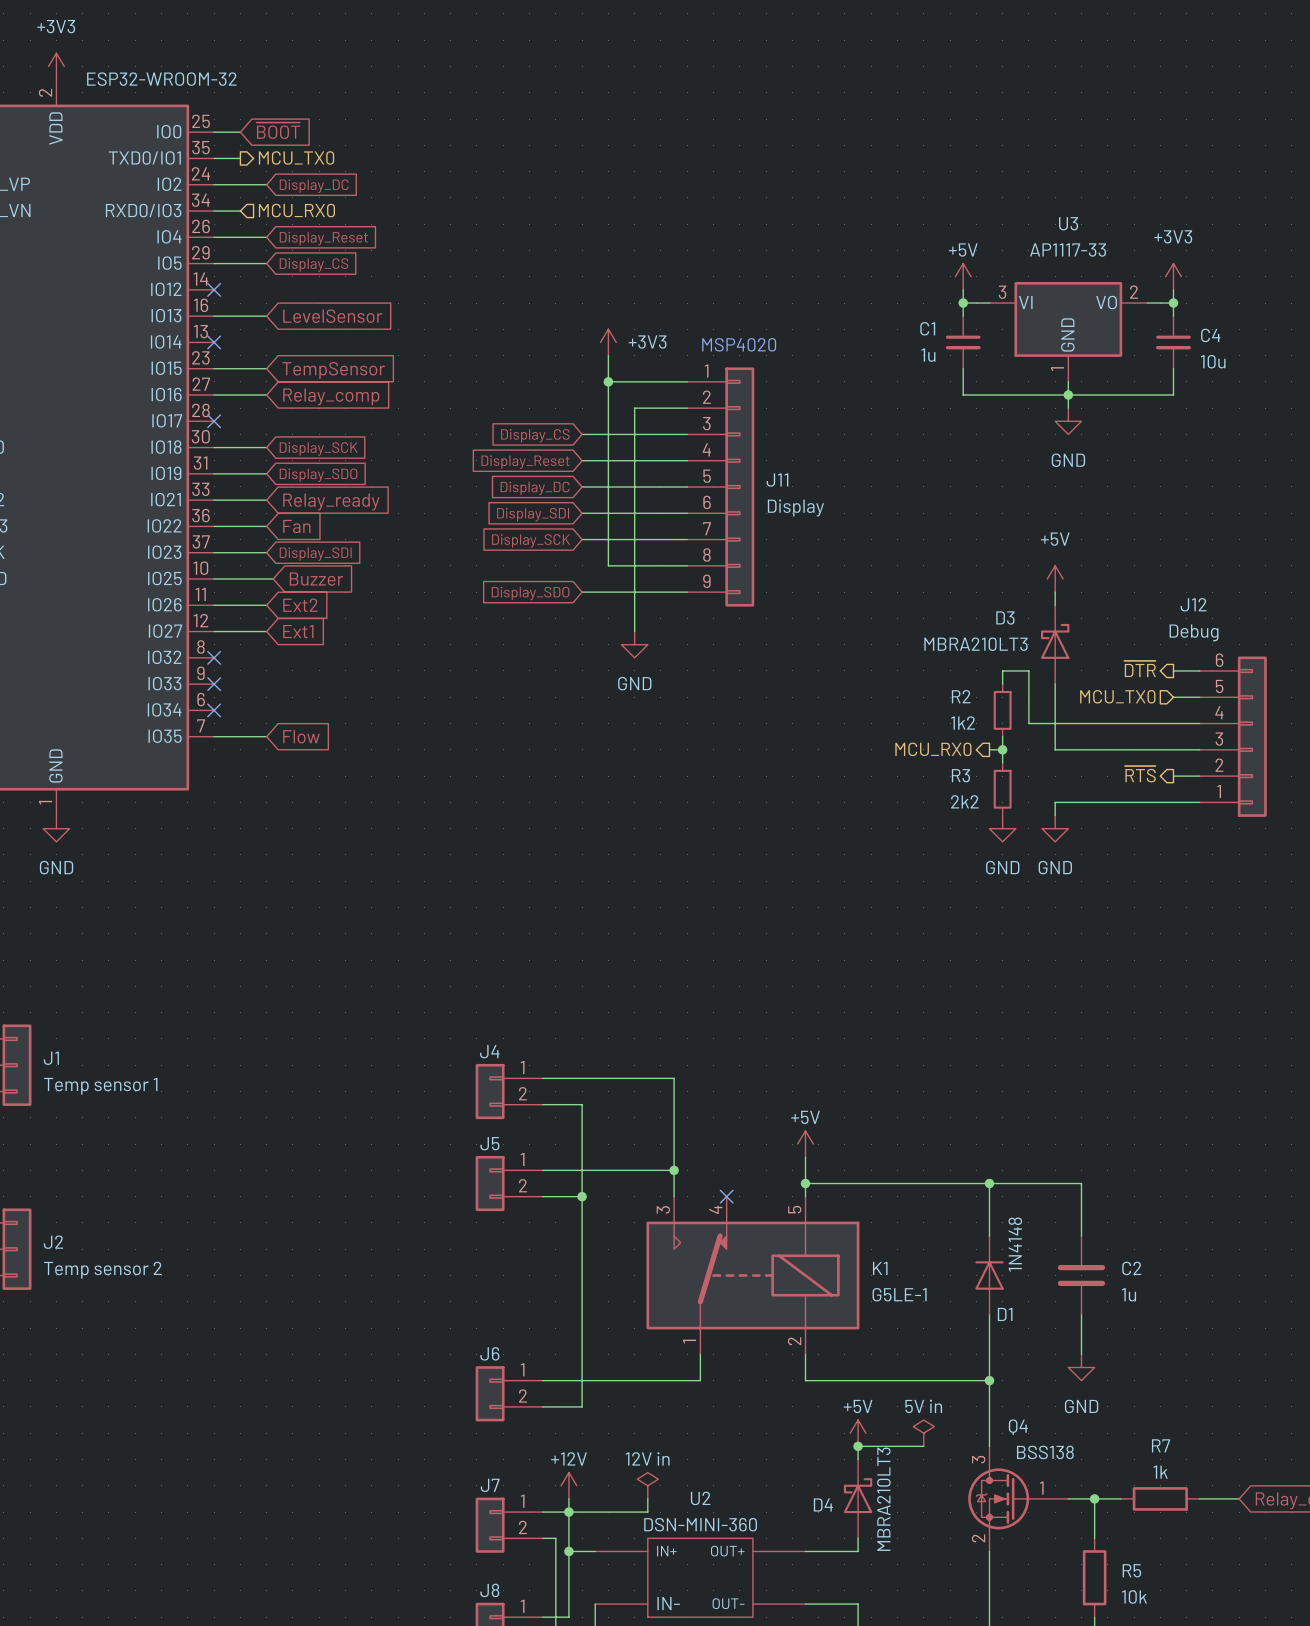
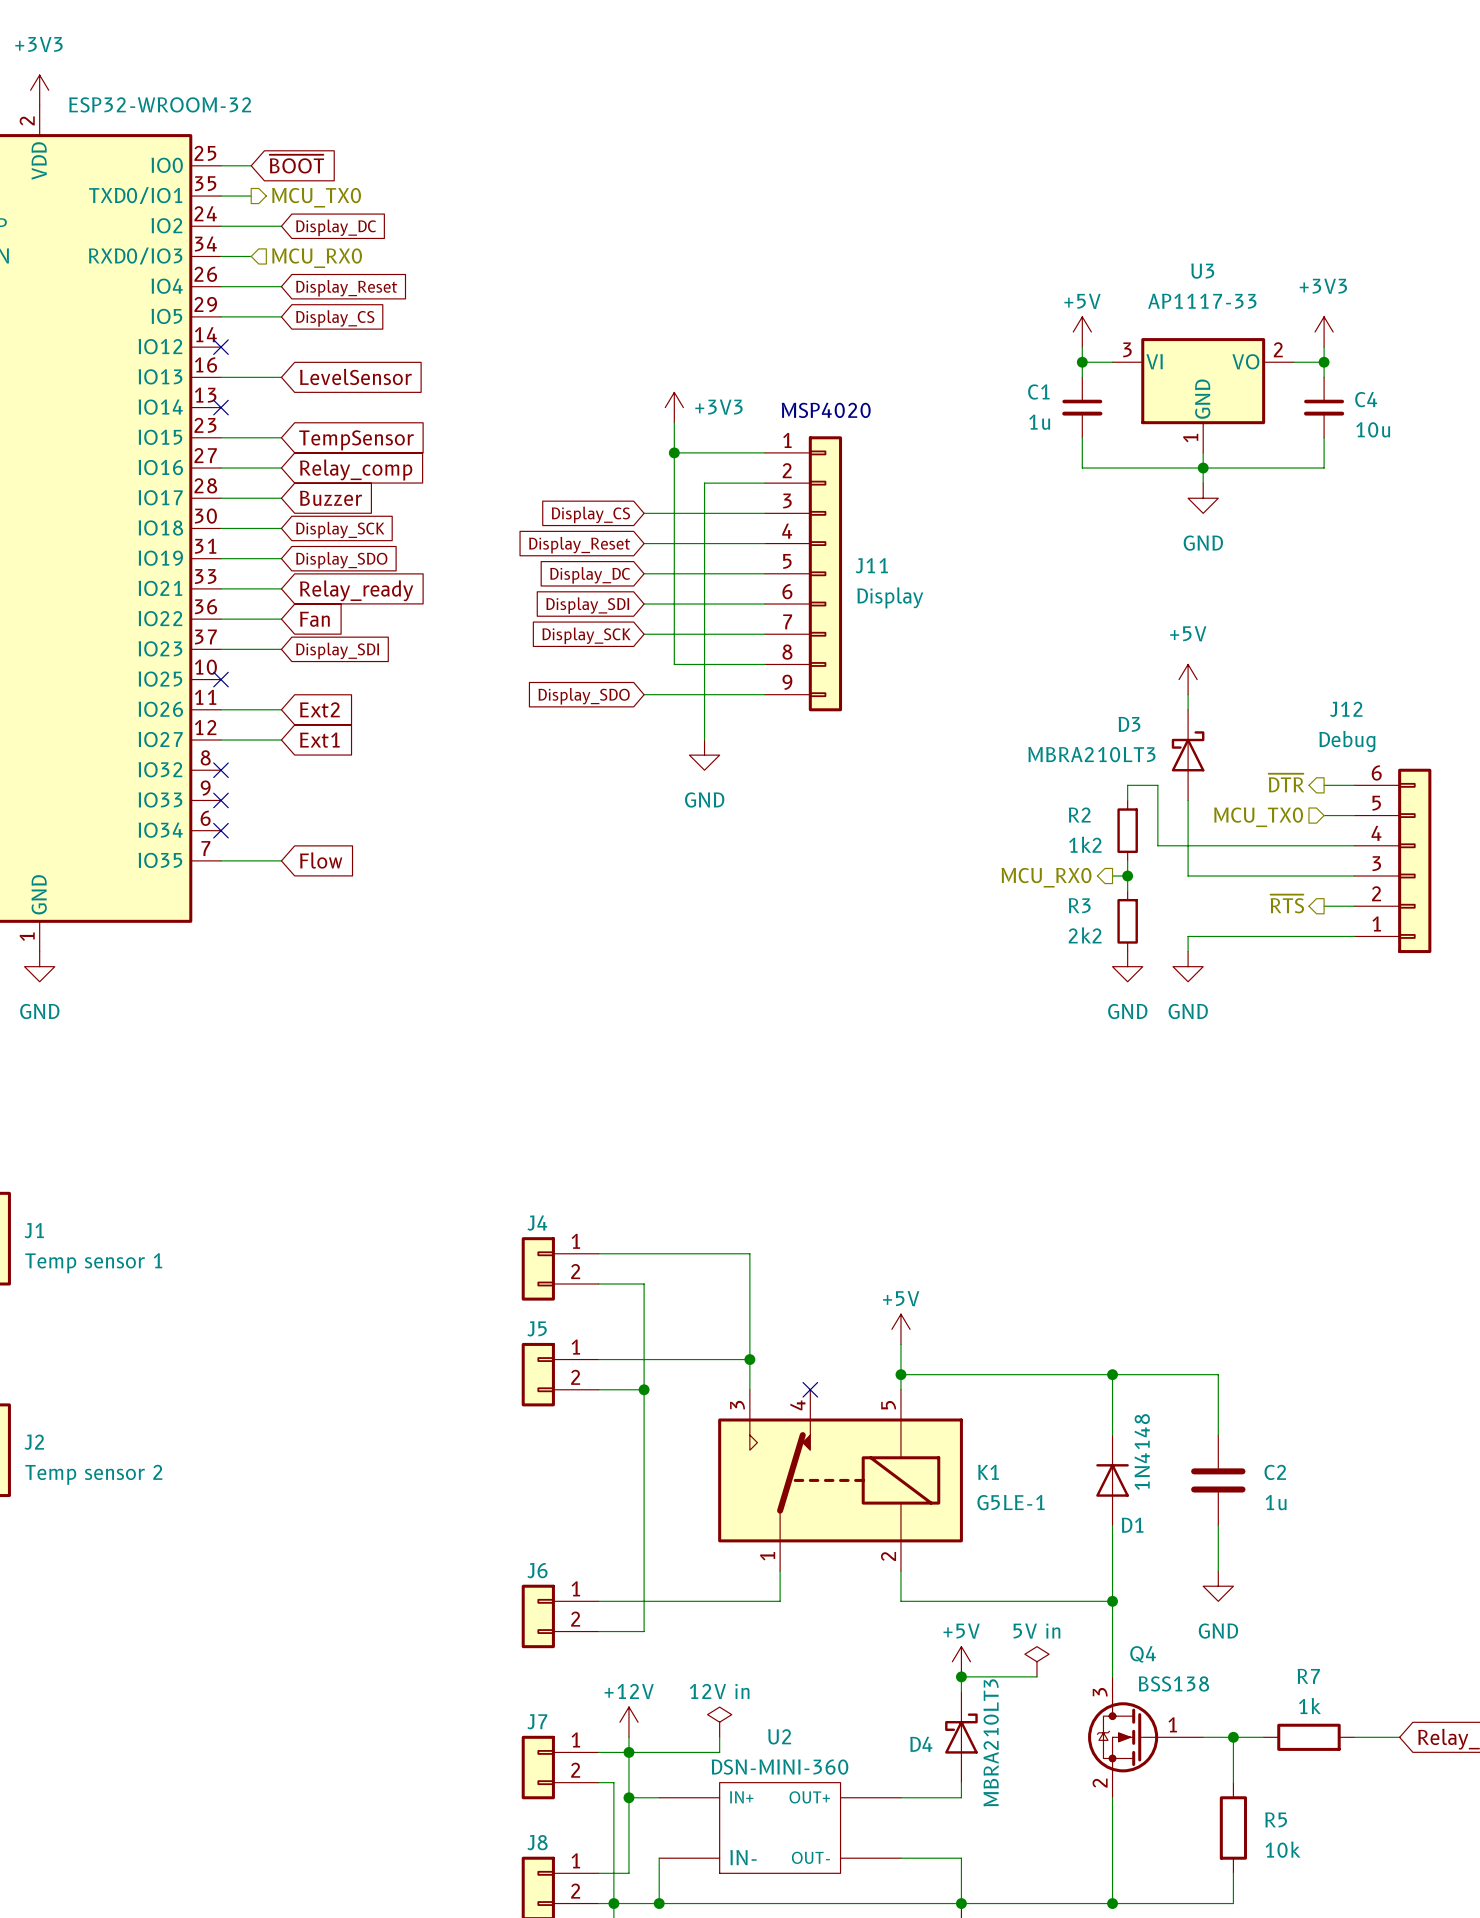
wire: none -> (221, 498) (281, 498)
no-connect mark: (214, 421) -> none
wire: (214, 578) (273, 578) -> none
no-connect mark: none -> (221, 679)
global label position: Buzzer (316, 579) -> Buzzer (331, 498)

